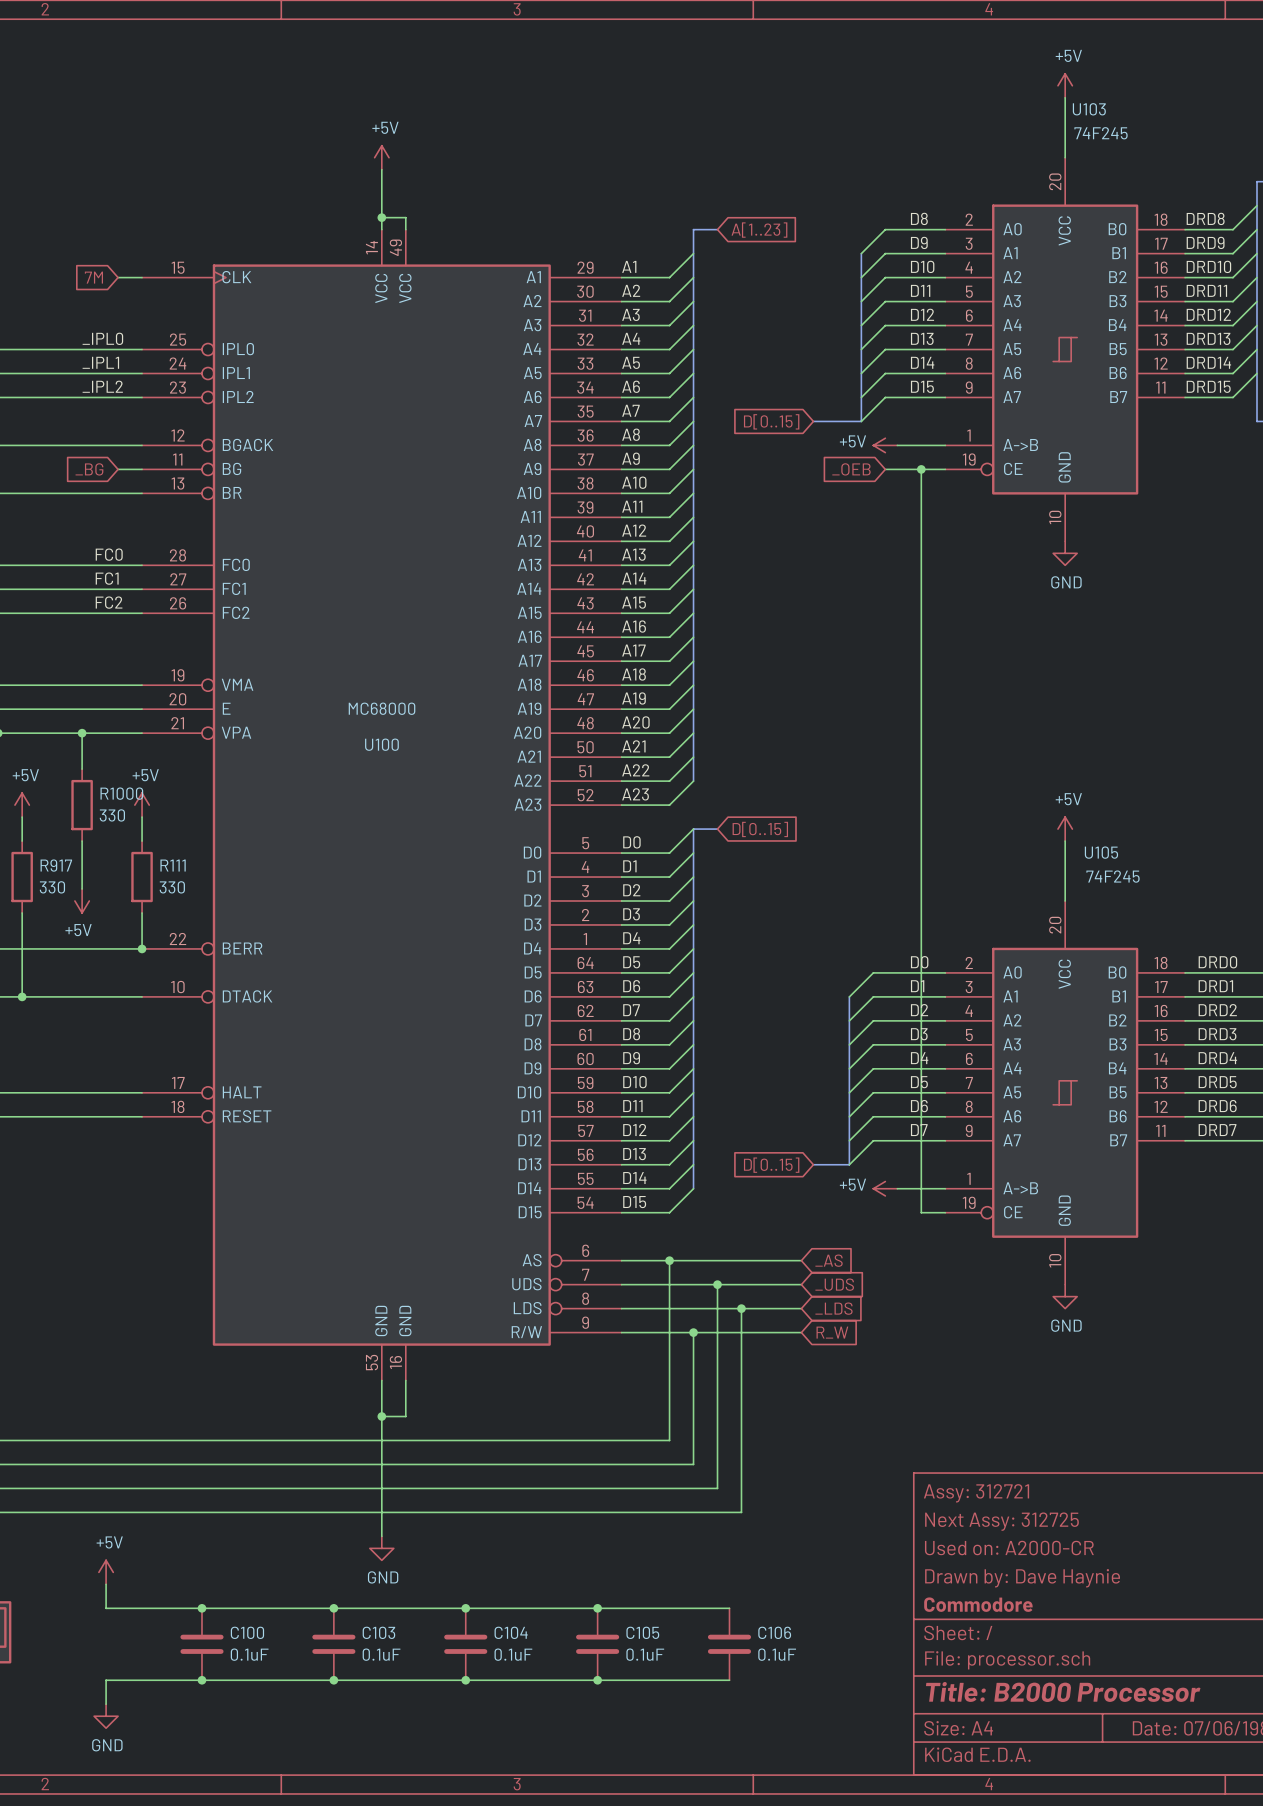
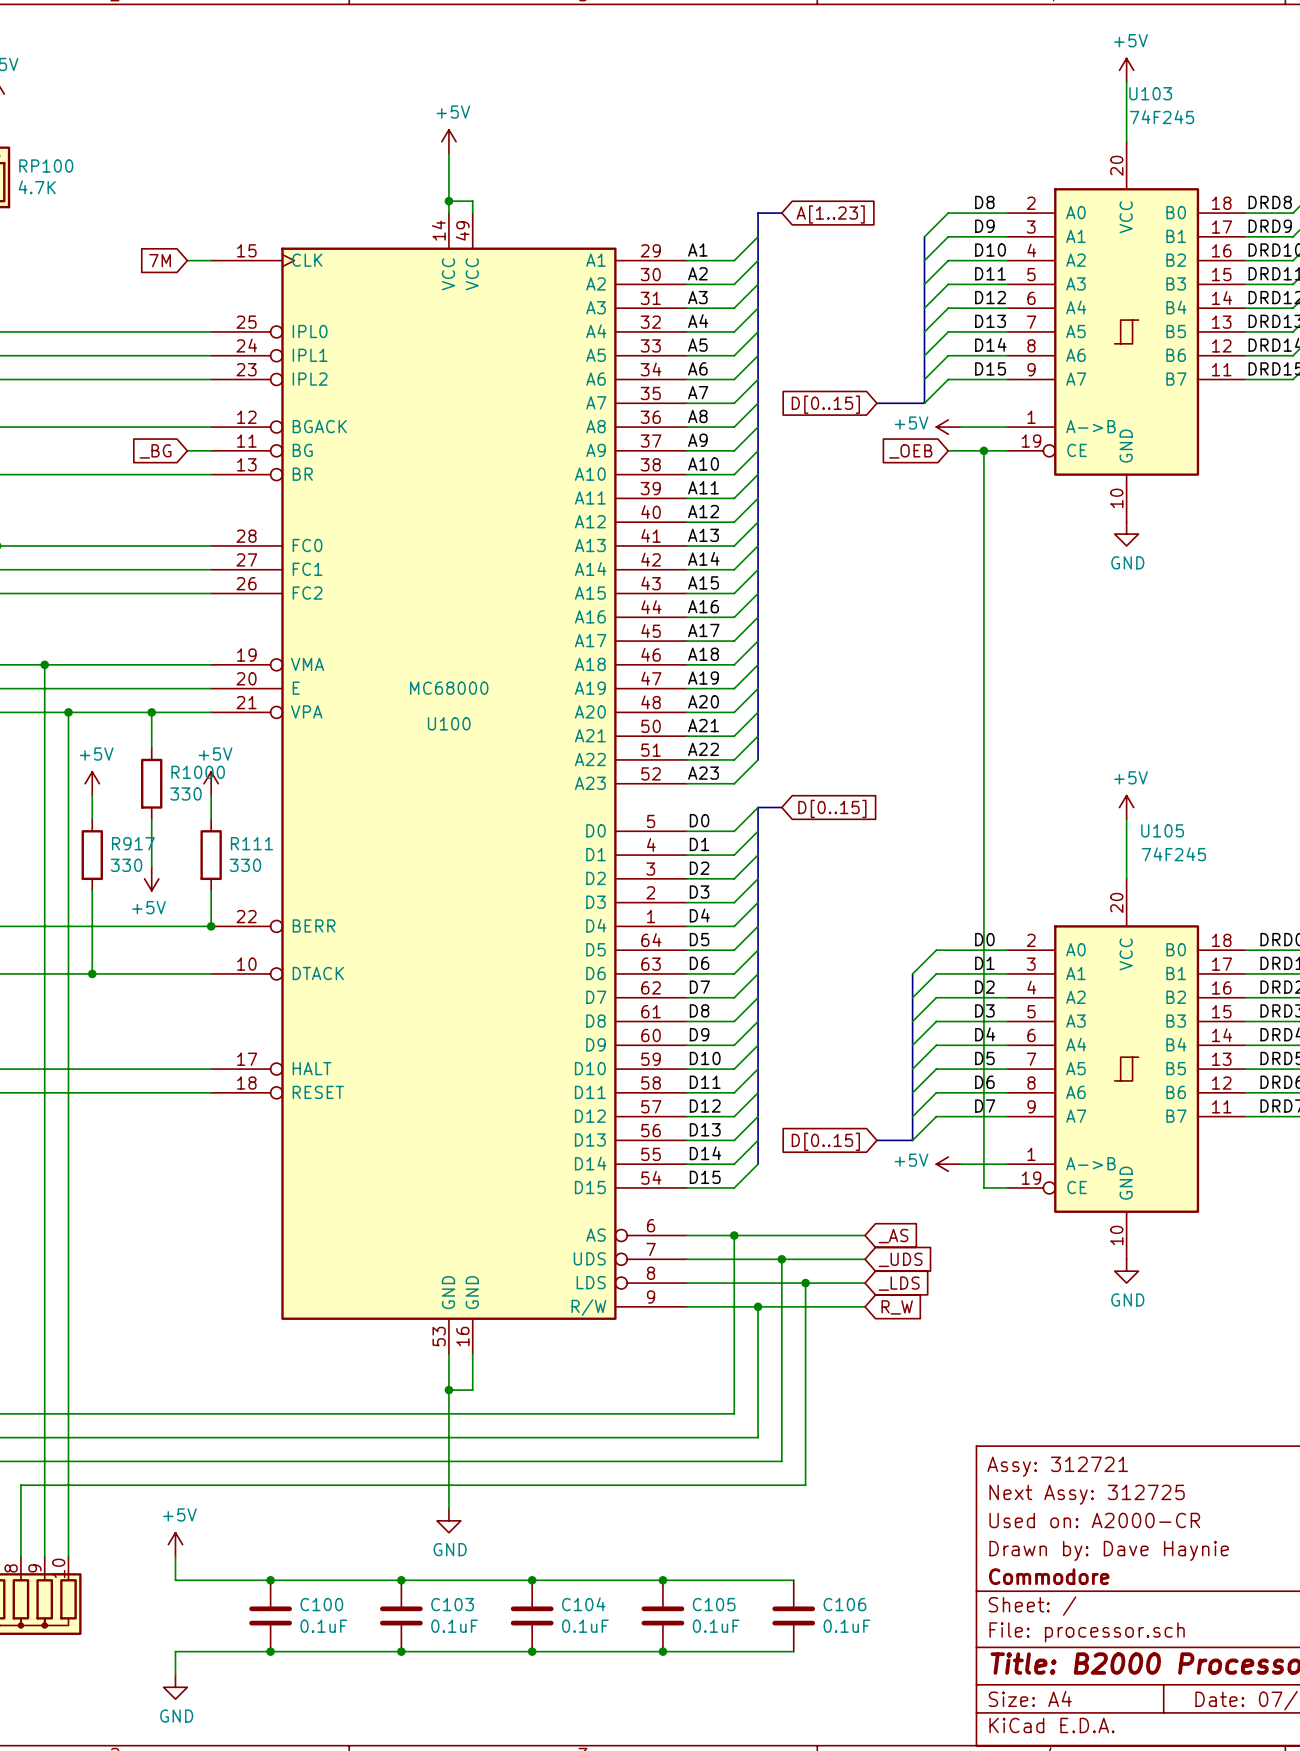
label: _IPL0 (102, 338) -> none
label: _IPL1 (100, 362) -> none
label: _IPL2 (102, 386) -> none
label: FC0 (109, 554) -> none
label: FC1 (107, 578) -> none
label: FC2 (109, 602) -> none

